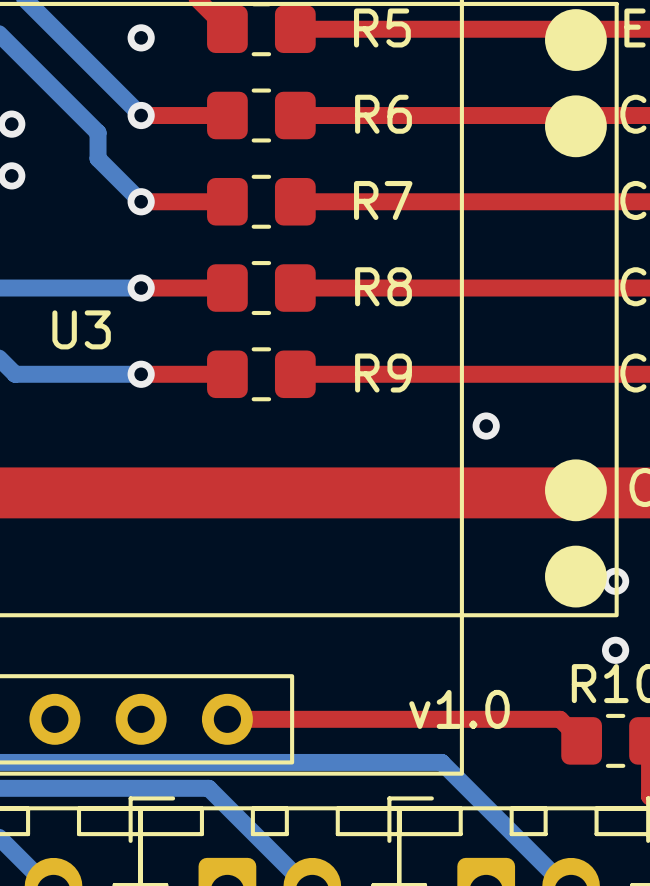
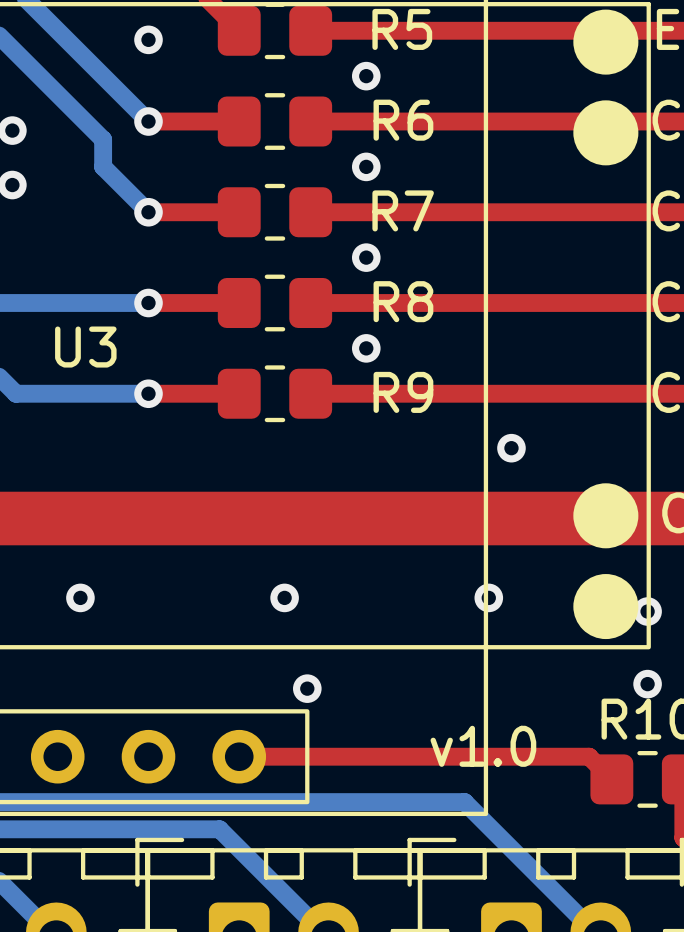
via: none -> (366, 76)
via: none -> (366, 166)
via: none -> (366, 257)
via: none -> (366, 348)
via: none -> (80, 597)
via: none -> (284, 597)
via: none -> (488, 597)
via: none -> (307, 688)

